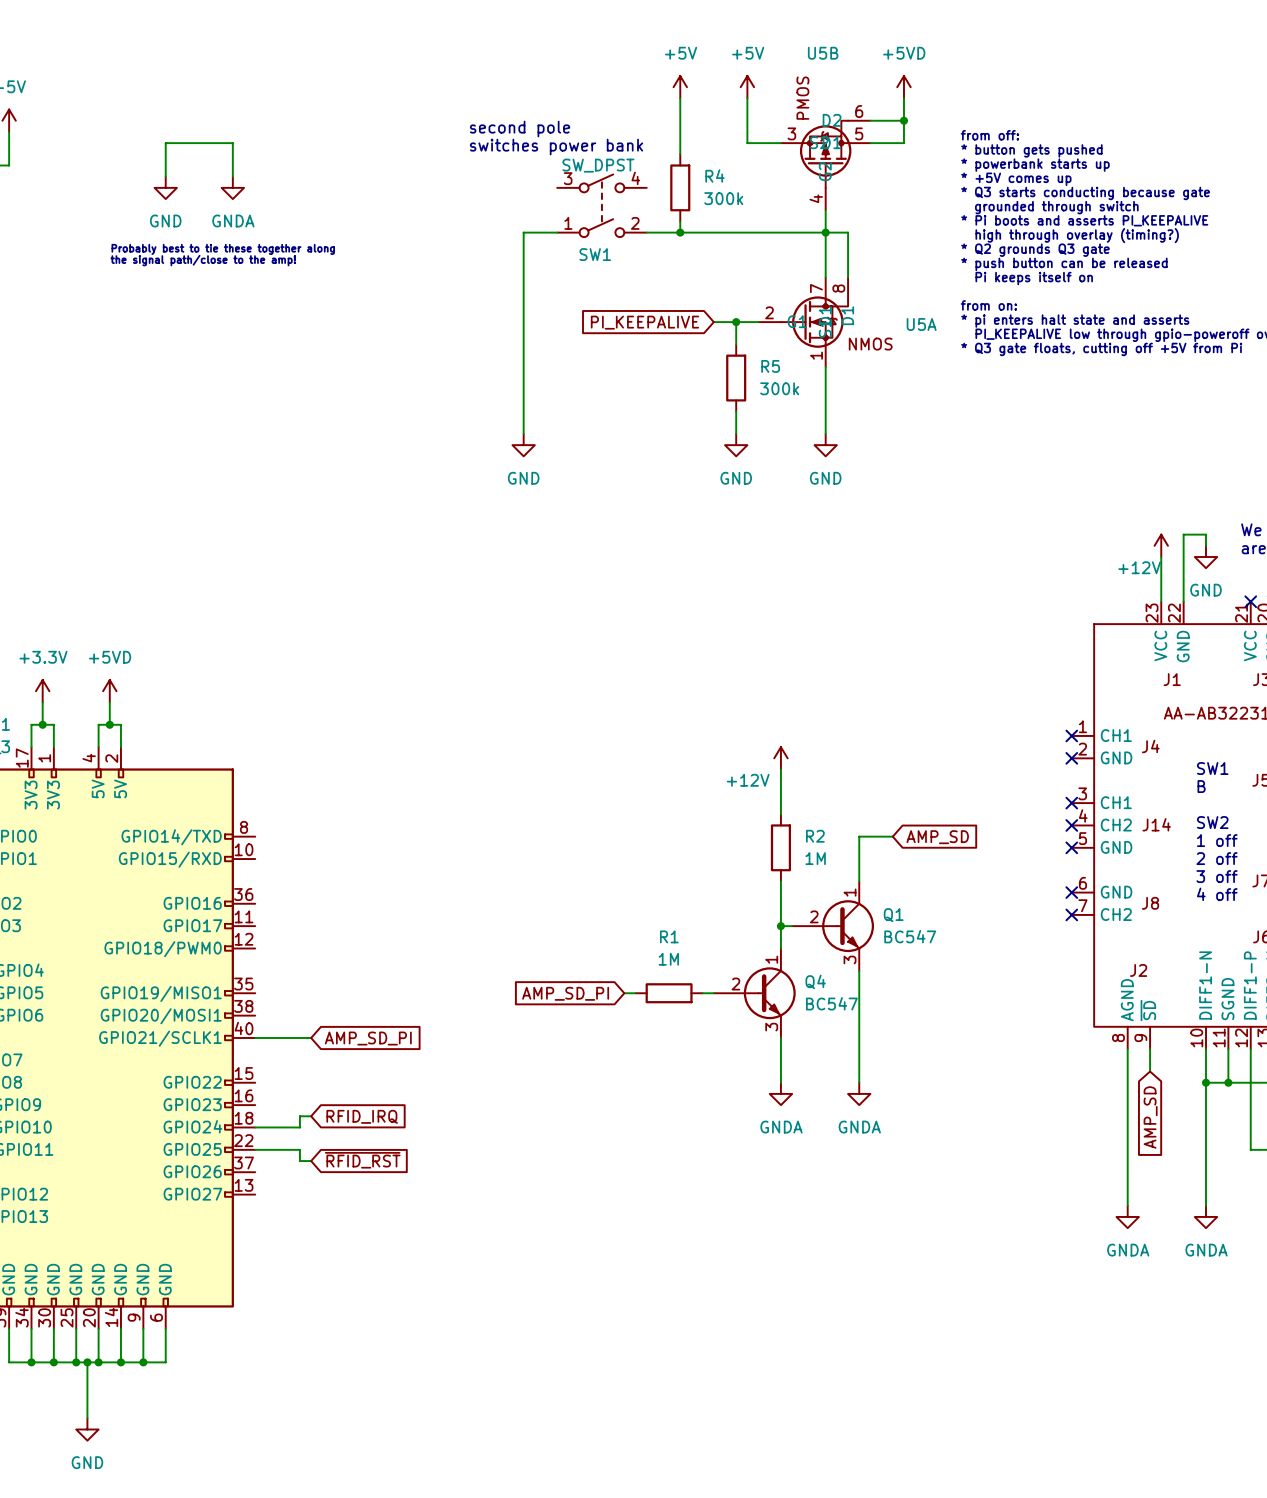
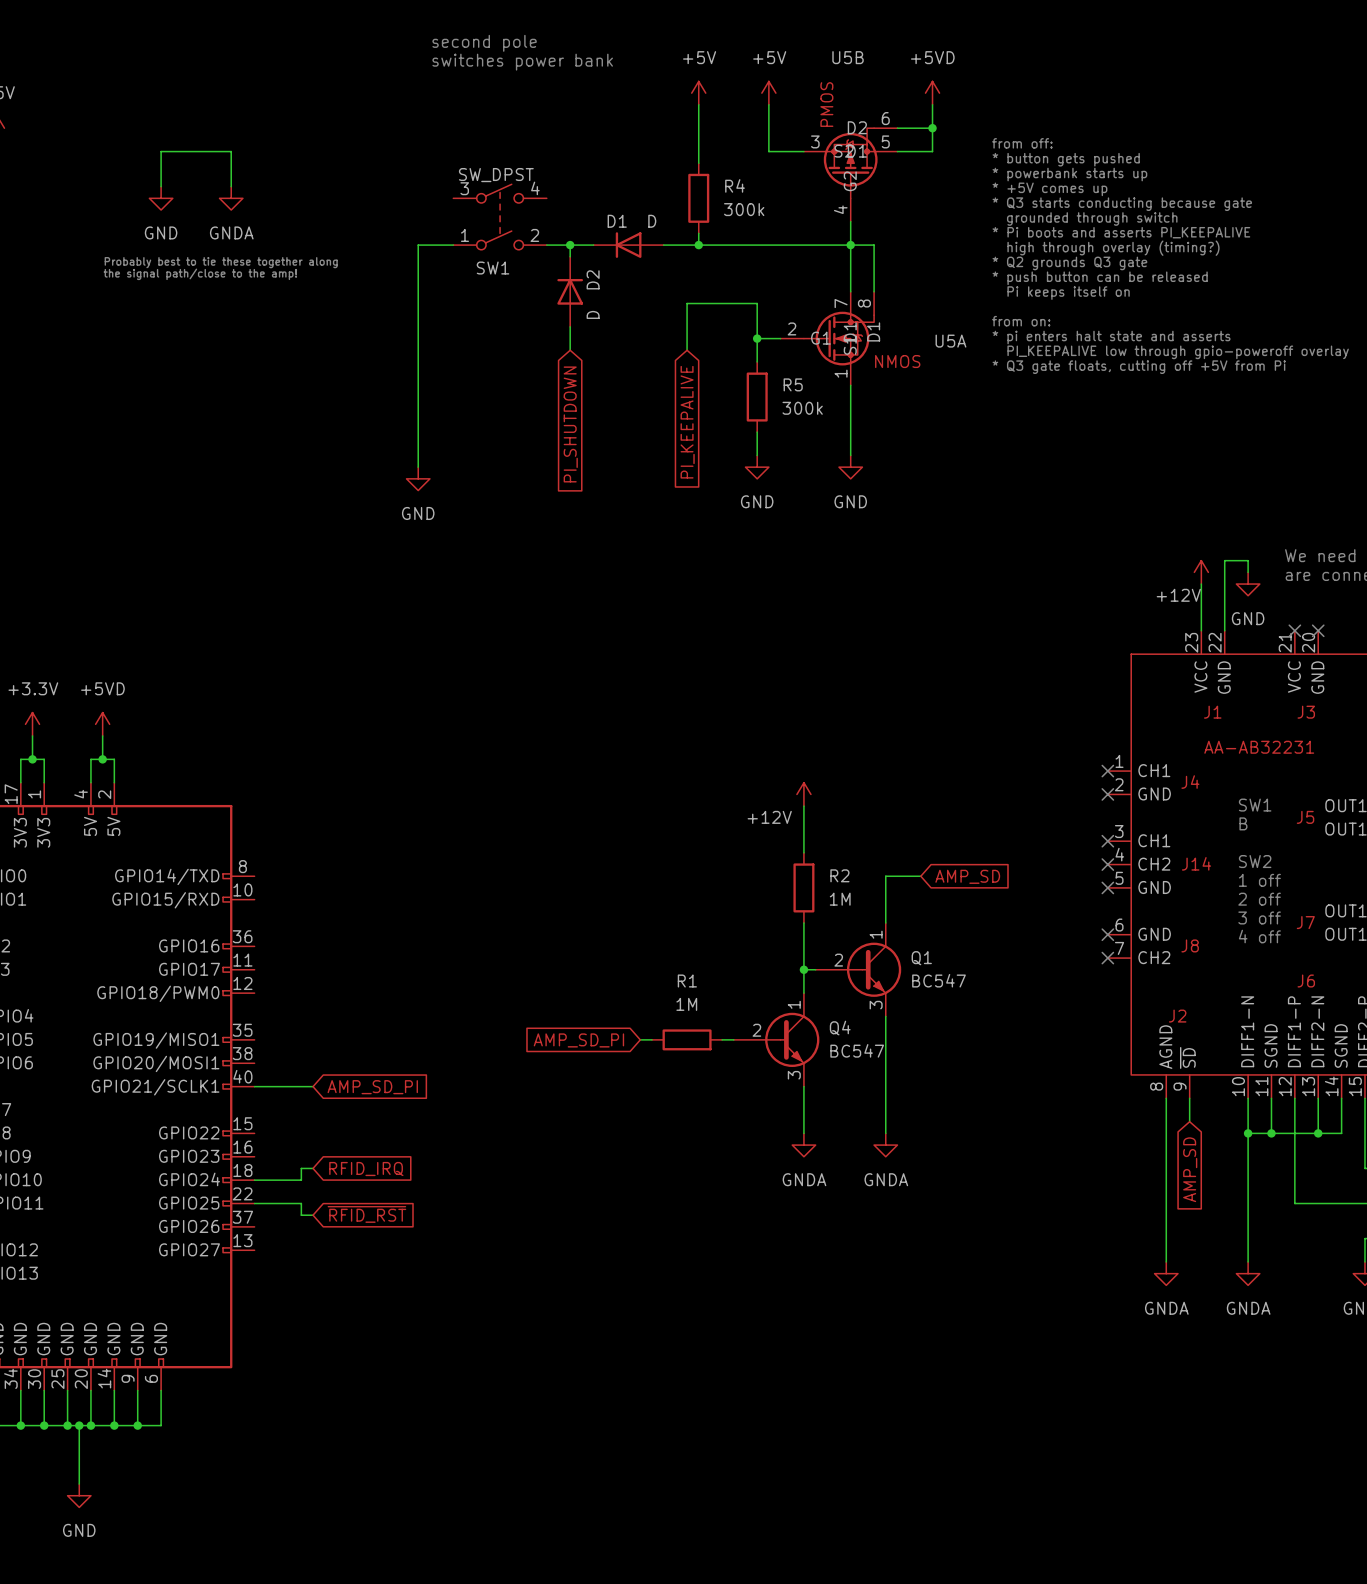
text position: second pole (520, 129) -> second pole (484, 43)
text position: switches power bank (556, 147) -> switches power bank (522, 62)
SW1 position: (601, 205) -> (500, 217)
wire: none -> (453, 245) (418, 245) (418, 467)
wire: (534, 232) (523, 232) (523, 433) -> none
junction: none -> (570, 245)
D1: none -> D (628, 245)
D2: none -> D (570, 291)
wire: none -> (570, 326) (570, 350)
global label rotation: 0° (644, 322) -> 90° counterclockwise (687, 422)
wire: (713, 322) (736, 322) -> (687, 350) (687, 303) (757, 303) (757, 338)
global label: none -> PI_SHUTDOWN (570, 424)
power symbol position: GND (523, 445) -> GND (418, 478)

